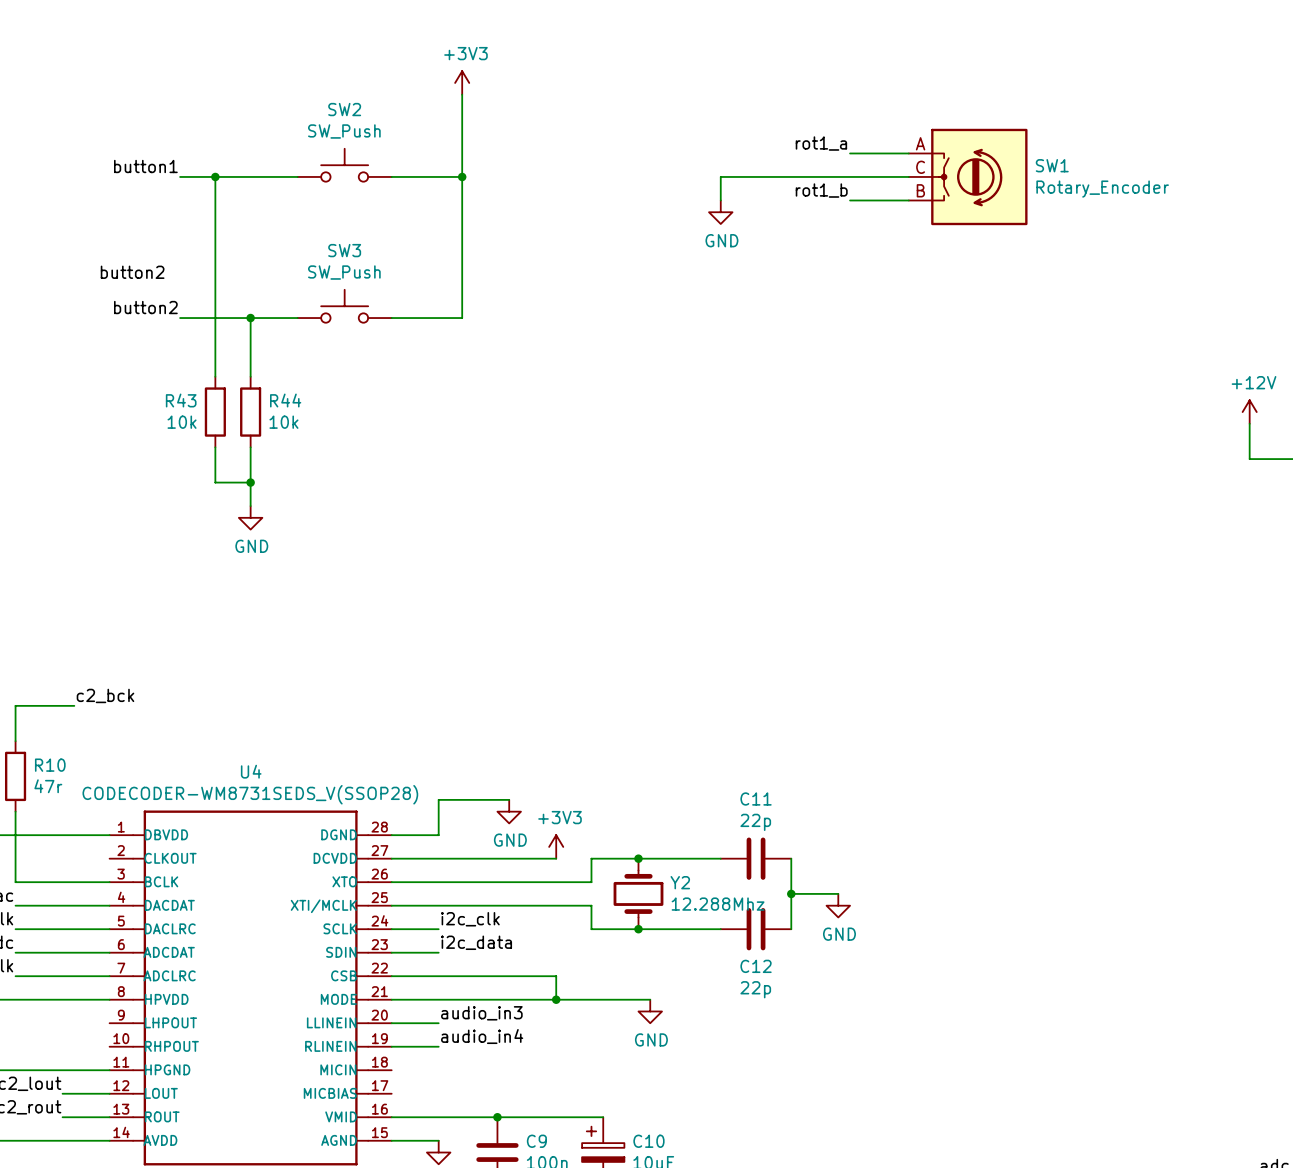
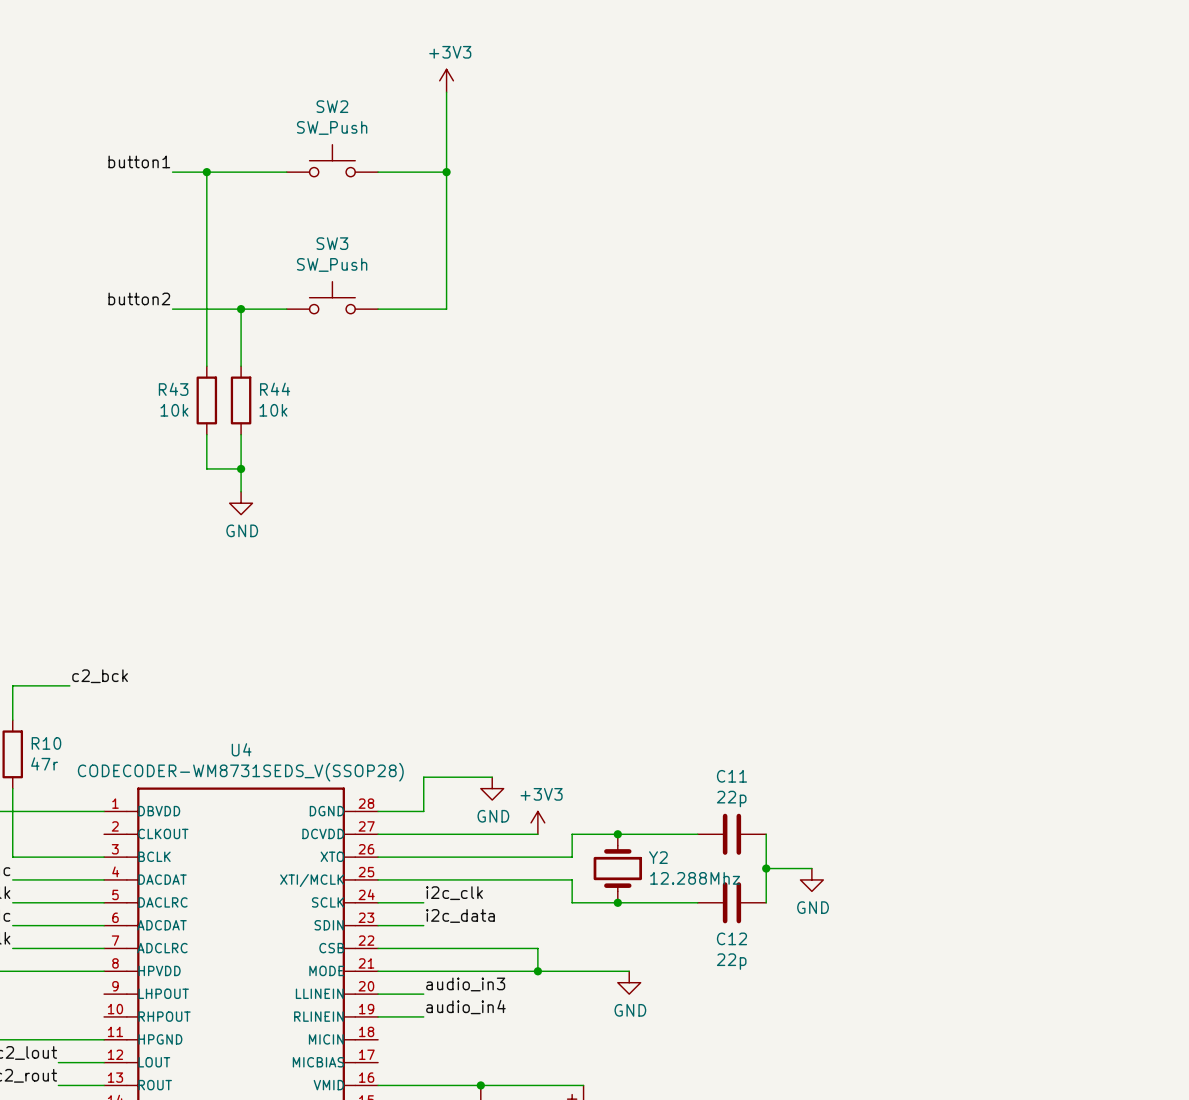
label: rot1_a (821, 143) -> none
wire: (850, 153) (908, 153) -> none
wire: (908, 176) (720, 176) (720, 200) -> none
SW1: Rotary_Encoder (968, 176) -> none
label: rot1_b (821, 190) -> none
wire: (850, 200) (908, 200) -> none
power symbol: GND (720, 212) -> none
label: button2 (132, 272) -> none

